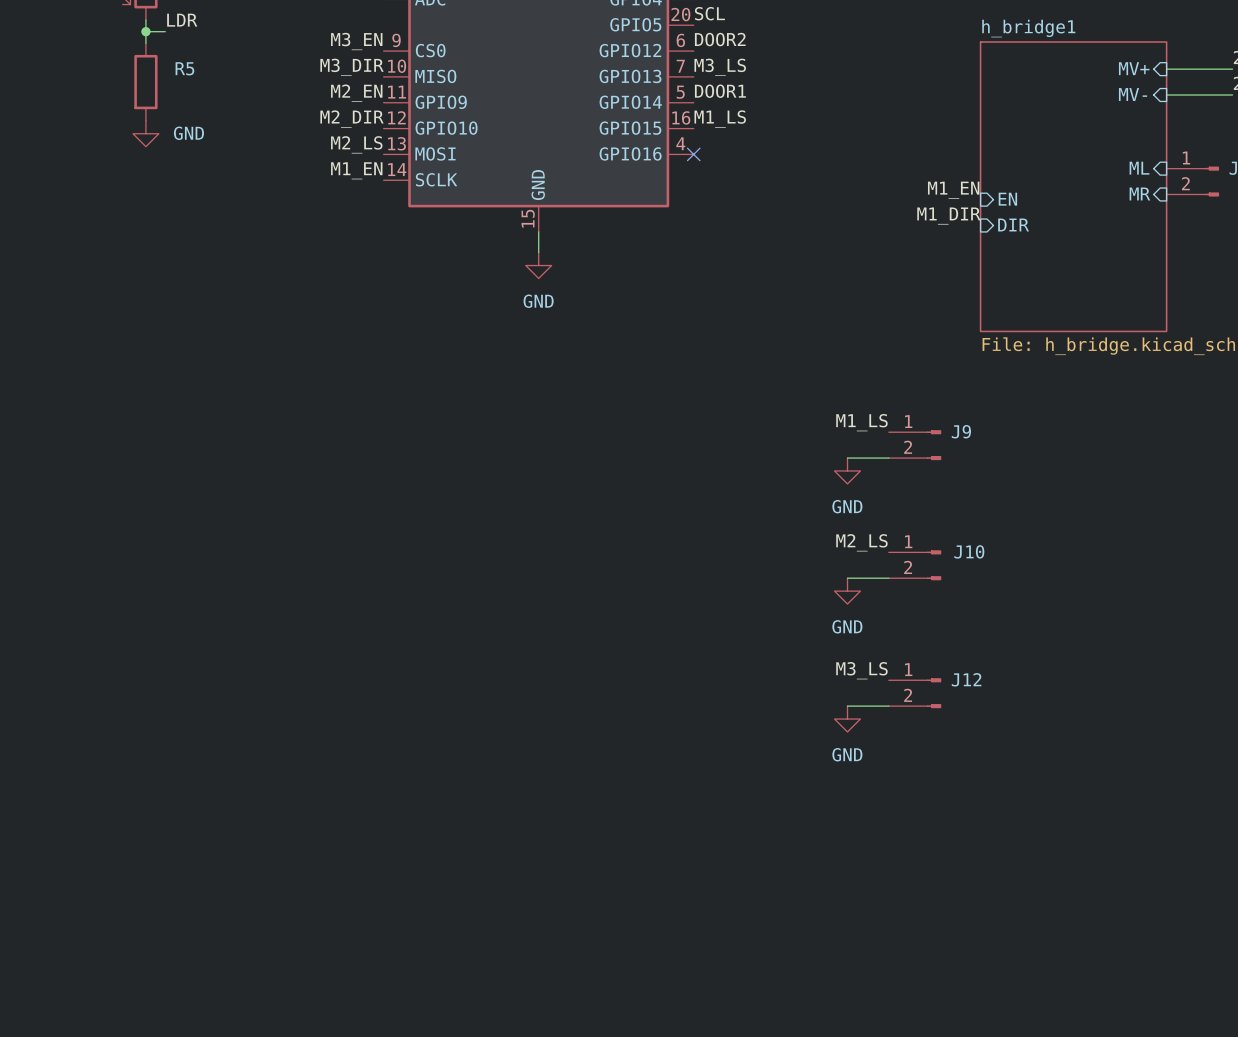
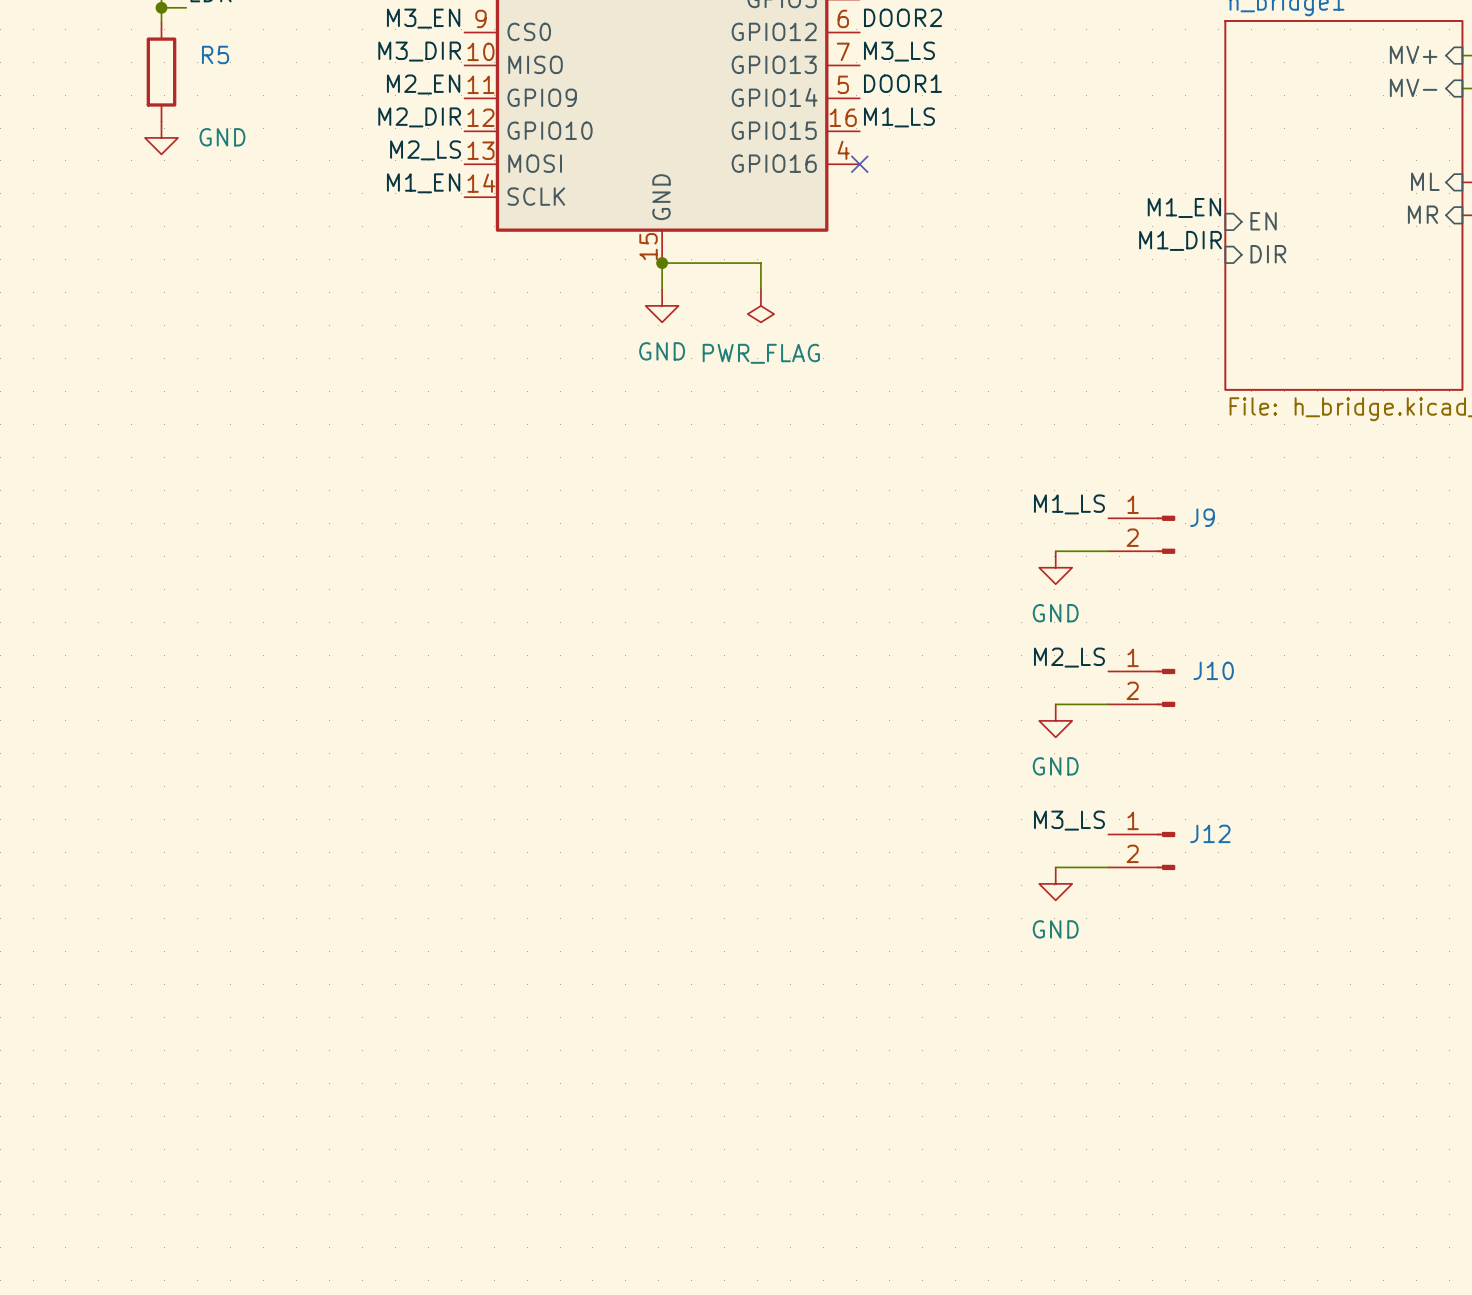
wire: none -> (662, 263) (760, 263) (760, 289)
junction: none -> (662, 263)
power symbol: none -> PWR_FLAG (760, 305)

